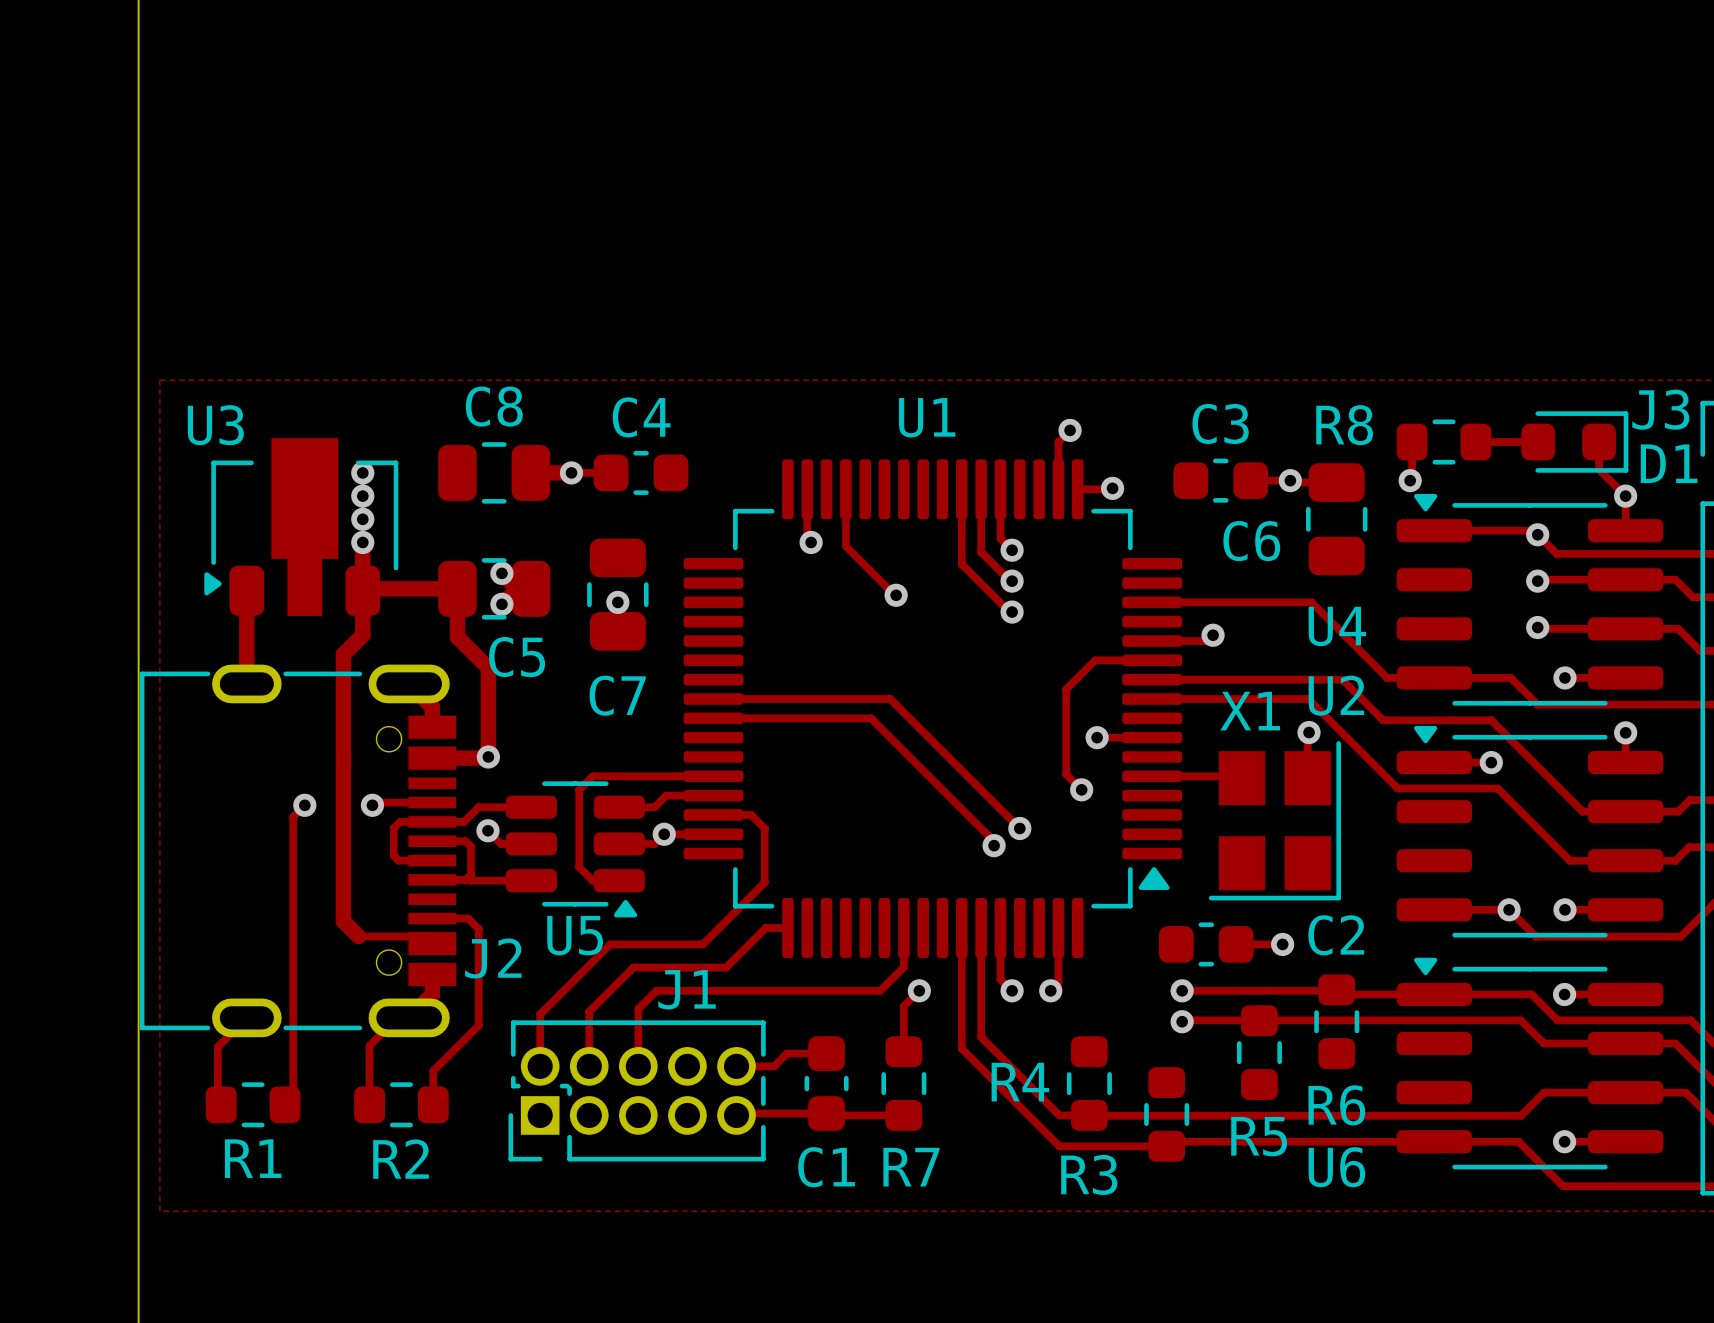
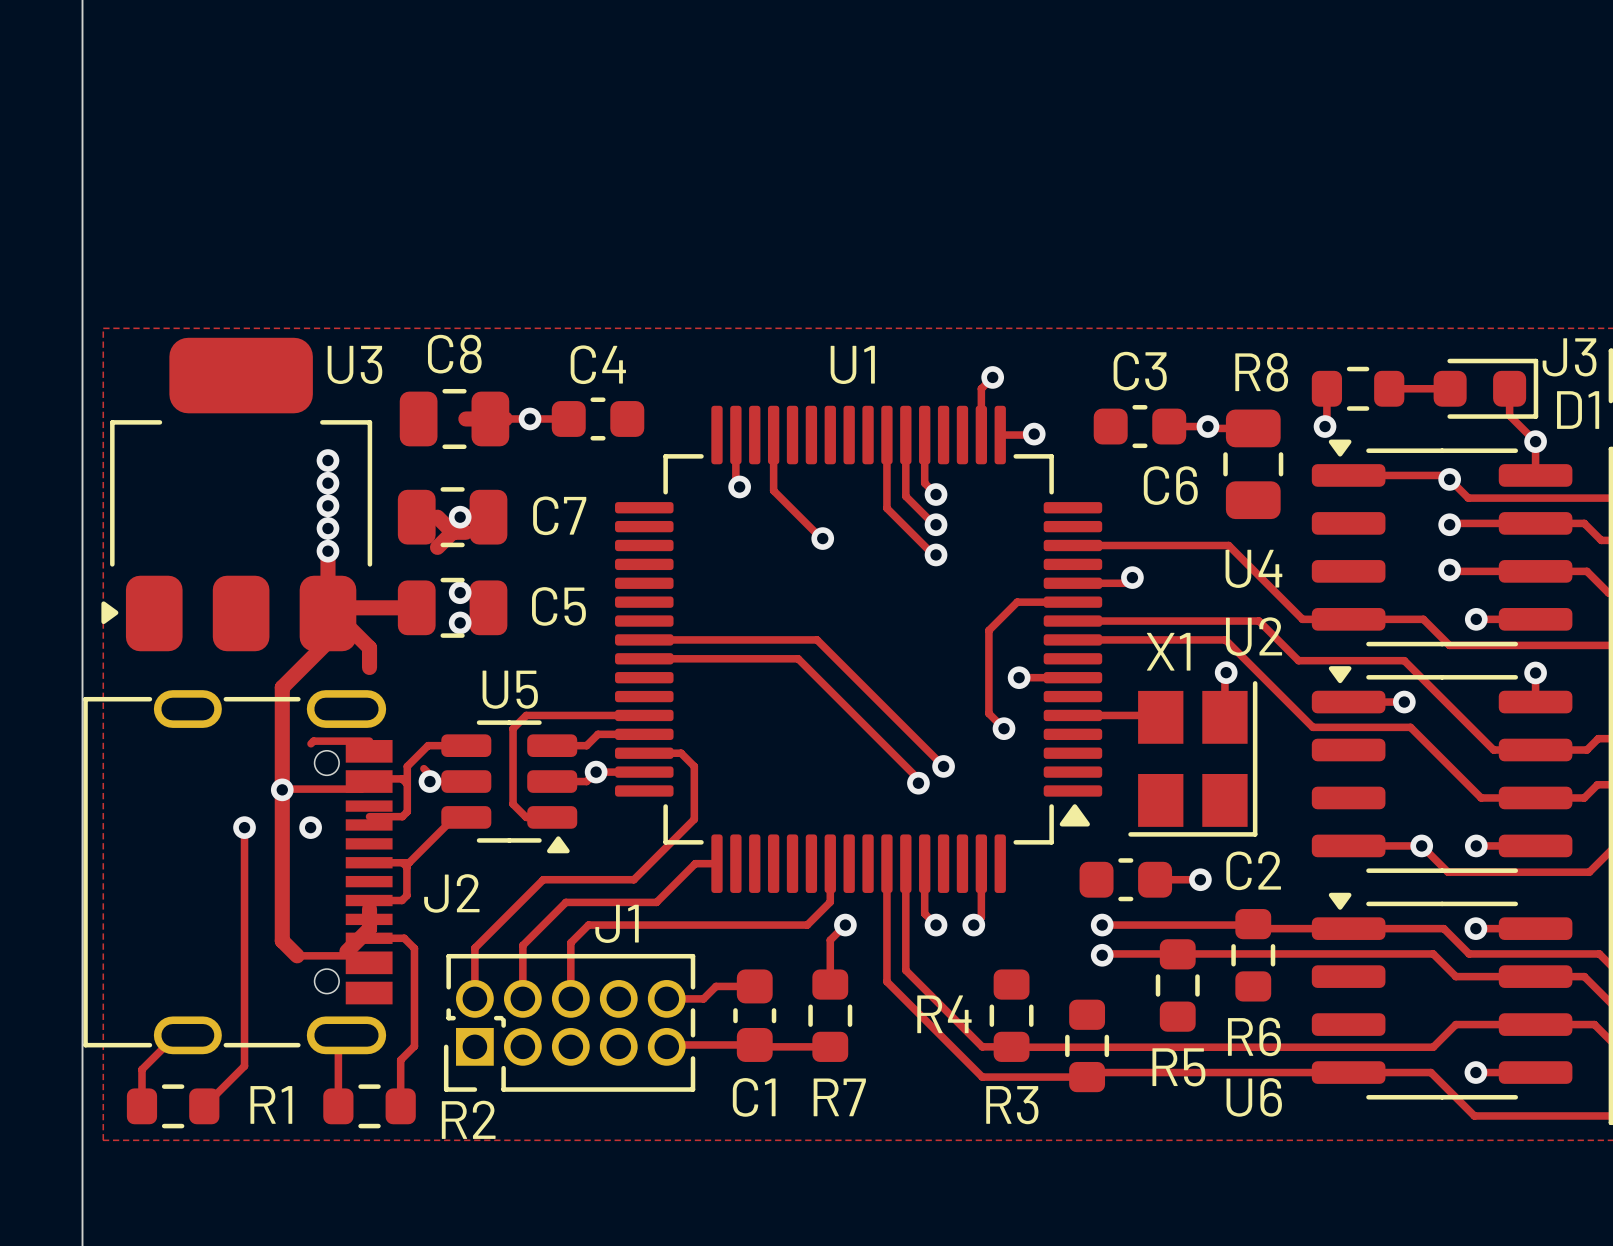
U3 name position: U3 (215, 425) -> U3 (354, 364)
U3 footprint: [204, 438, 399, 616] -> [101, 337, 373, 652]
via: (362, 472) -> none
C8 position: (494, 472) -> (454, 418)
via position: (571, 472) -> (530, 418)
C4 position: (641, 472) -> (598, 418)
via: (362, 496) -> none
via: none -> (327, 460)
via: (362, 519) -> none
via: none -> (327, 483)
track: (362, 542) (362, 635) (343, 654) (343, 921) (358, 936) (425, 936) (432, 943) -> none
via: (362, 542) -> none
via: none -> (327, 505)
via: (501, 573) -> none
via: none -> (460, 517)
via: none -> (327, 528)
C5 position: (494, 588) -> (452, 607)
track: (246, 590) (246, 683) -> none
track: (362, 590) (364, 588) (457, 588) (457, 637) (488, 668) (488, 756) (432, 758) -> none
C7 rotation: 0° (617, 594) -> 90° clockwise (452, 517)
C7 position: (617, 594) -> (452, 517)
via: (617, 602) -> none
via: (501, 604) -> none
track: none -> (327, 551) (327, 641) (282, 687) (282, 940) (297, 955) (362, 955) (369, 962)
via: none -> (327, 551)
via: none -> (460, 592)
C5 name position: C5 (517, 657) -> C5 (558, 606)
track: none -> (416, 607) (333, 607) (327, 613)
via: none -> (460, 622)
C7 name position: C7 (617, 695) -> C7 (559, 515)
via: (488, 756) -> none
track: (304, 805) (293, 816) (293, 1100) (288, 1104) -> none
via: (304, 805) -> none
via: (372, 805) -> none
track: (492, 807) (478, 807) (464, 821) (400, 821) (393, 828) (393, 855) (398, 860) (432, 860) -> (428, 745) (407, 766) (407, 784)
via position: (488, 830) -> (429, 781)
track: none -> (369, 781) (361, 789) (283, 789)
J2 position: (298, 850) -> (237, 872)
via: none -> (282, 789)
track: (467, 877) (470, 880) (519, 880) -> (369, 862) (409, 862) (454, 817)
track: none -> (244, 827) (244, 1066) (204, 1106)
via: none -> (244, 827)
via: none -> (310, 827)
track: (432, 918) (468, 918) (478, 928) (478, 1025) (433, 1071) (433, 1104) -> none
track: none -> (402, 862) (406, 867) (406, 895) (402, 900) (369, 900)
U5 name position: U5 (575, 935) -> U5 (510, 689)
J2 name position: J2 (493, 958) -> J2 (451, 893)
track: none -> (369, 938) (404, 938) (414, 948) (414, 1046) (400, 1060) (400, 1106)
track: (246, 1017) (217, 1046) (217, 1104) -> none
track: (423, 1032) (409, 1017) (397, 1017) (369, 1045) (369, 1104) -> none
track: none -> (187, 1035) (176, 1035) (141, 1069) (141, 1106)
track: none -> (346, 1035) (338, 1043) (338, 1106)
R1 position: (253, 1104) -> (173, 1106)
R2 position: (401, 1104) -> (369, 1106)
R1 name position: R1 (253, 1158) -> R1 (271, 1104)
R2 name position: R2 (401, 1159) -> R2 (468, 1119)

